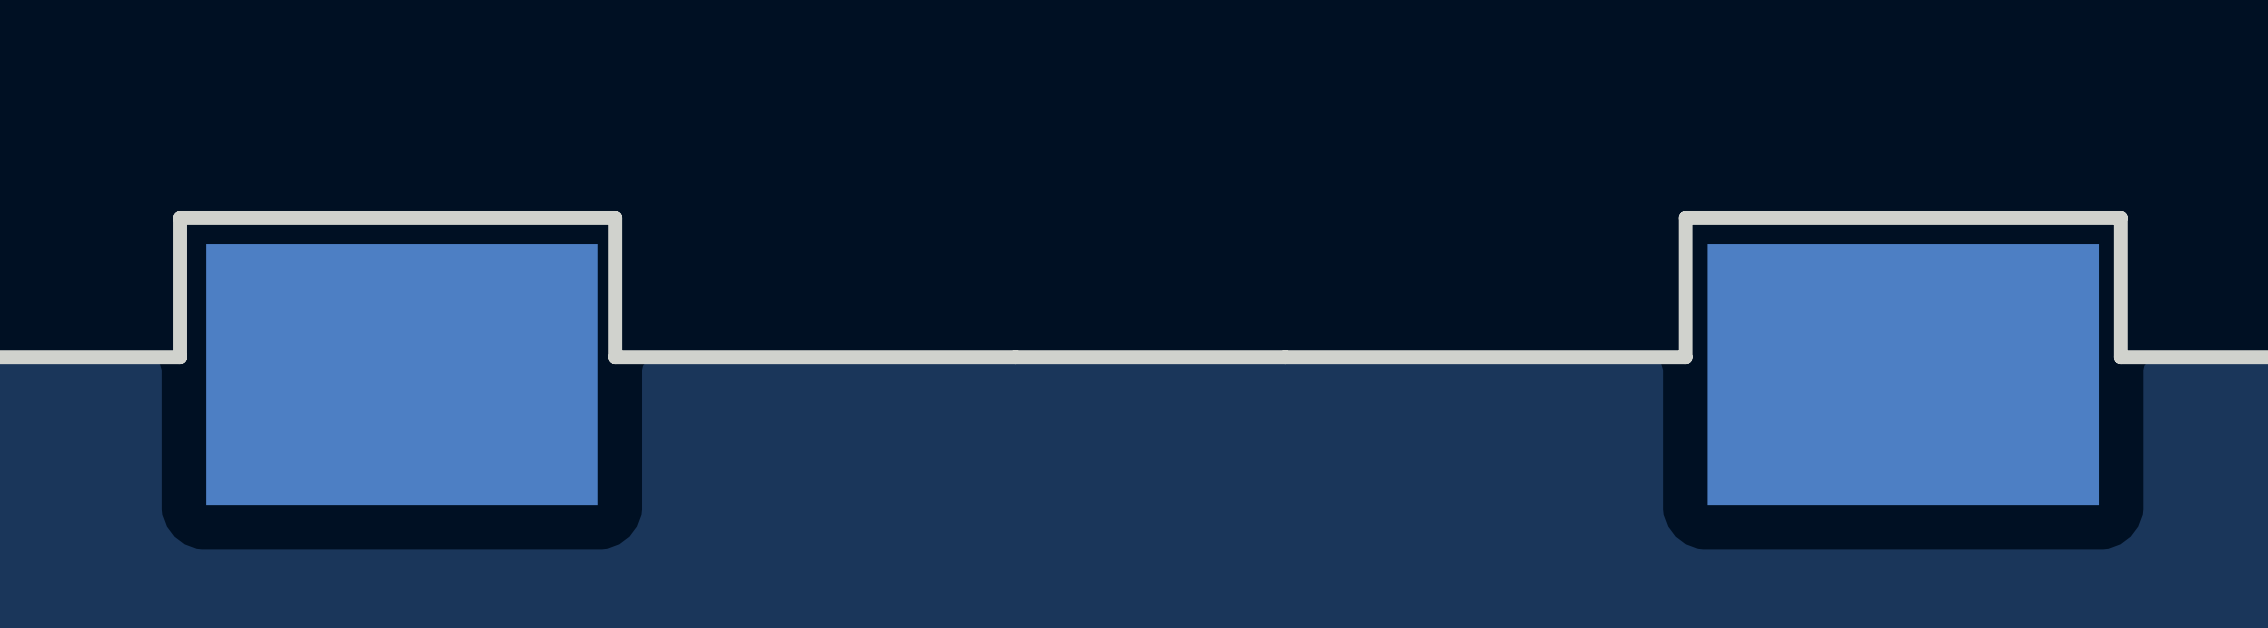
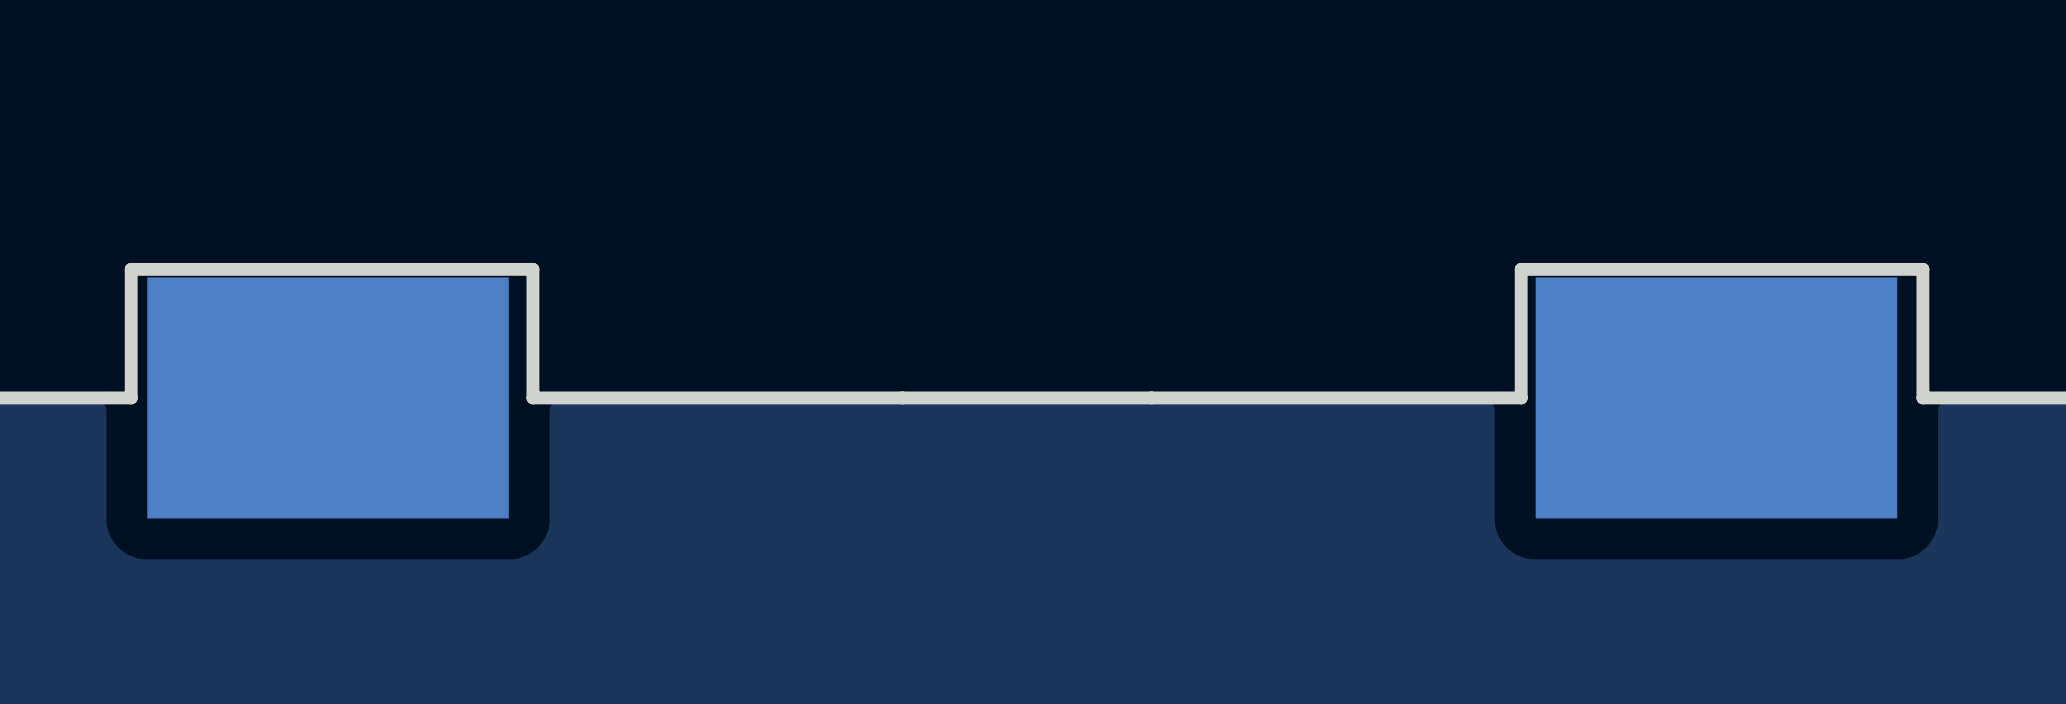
part position: (401, 374) -> (328, 397)
part position: (1903, 374) -> (1716, 397)

